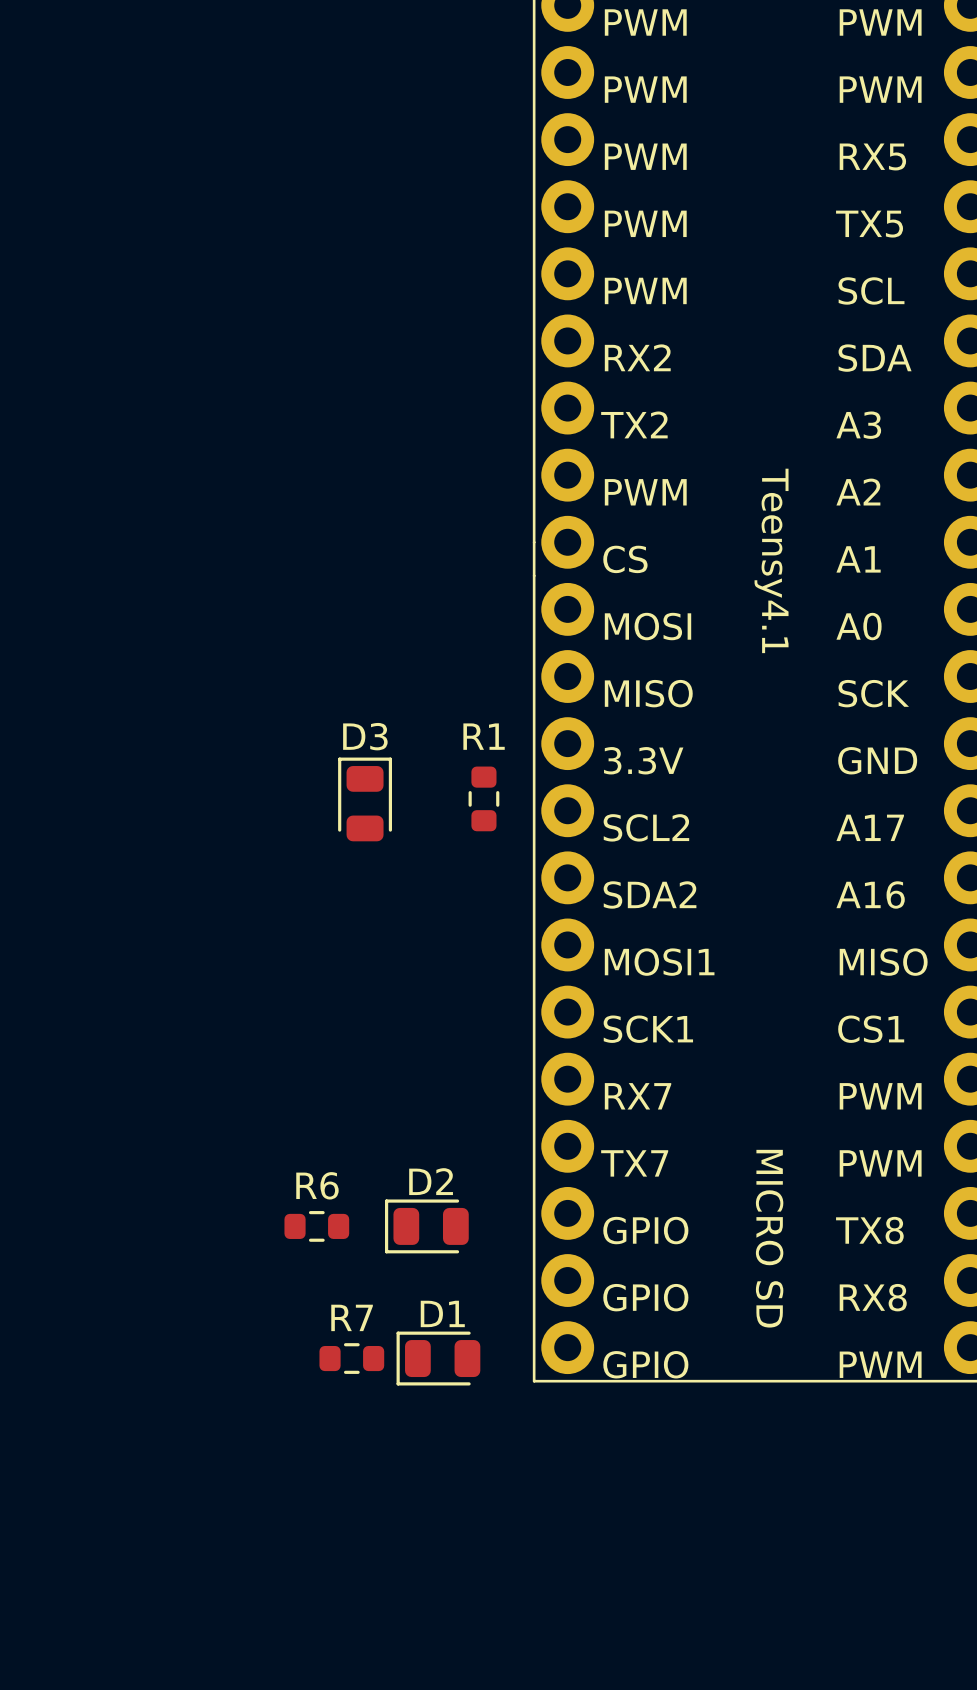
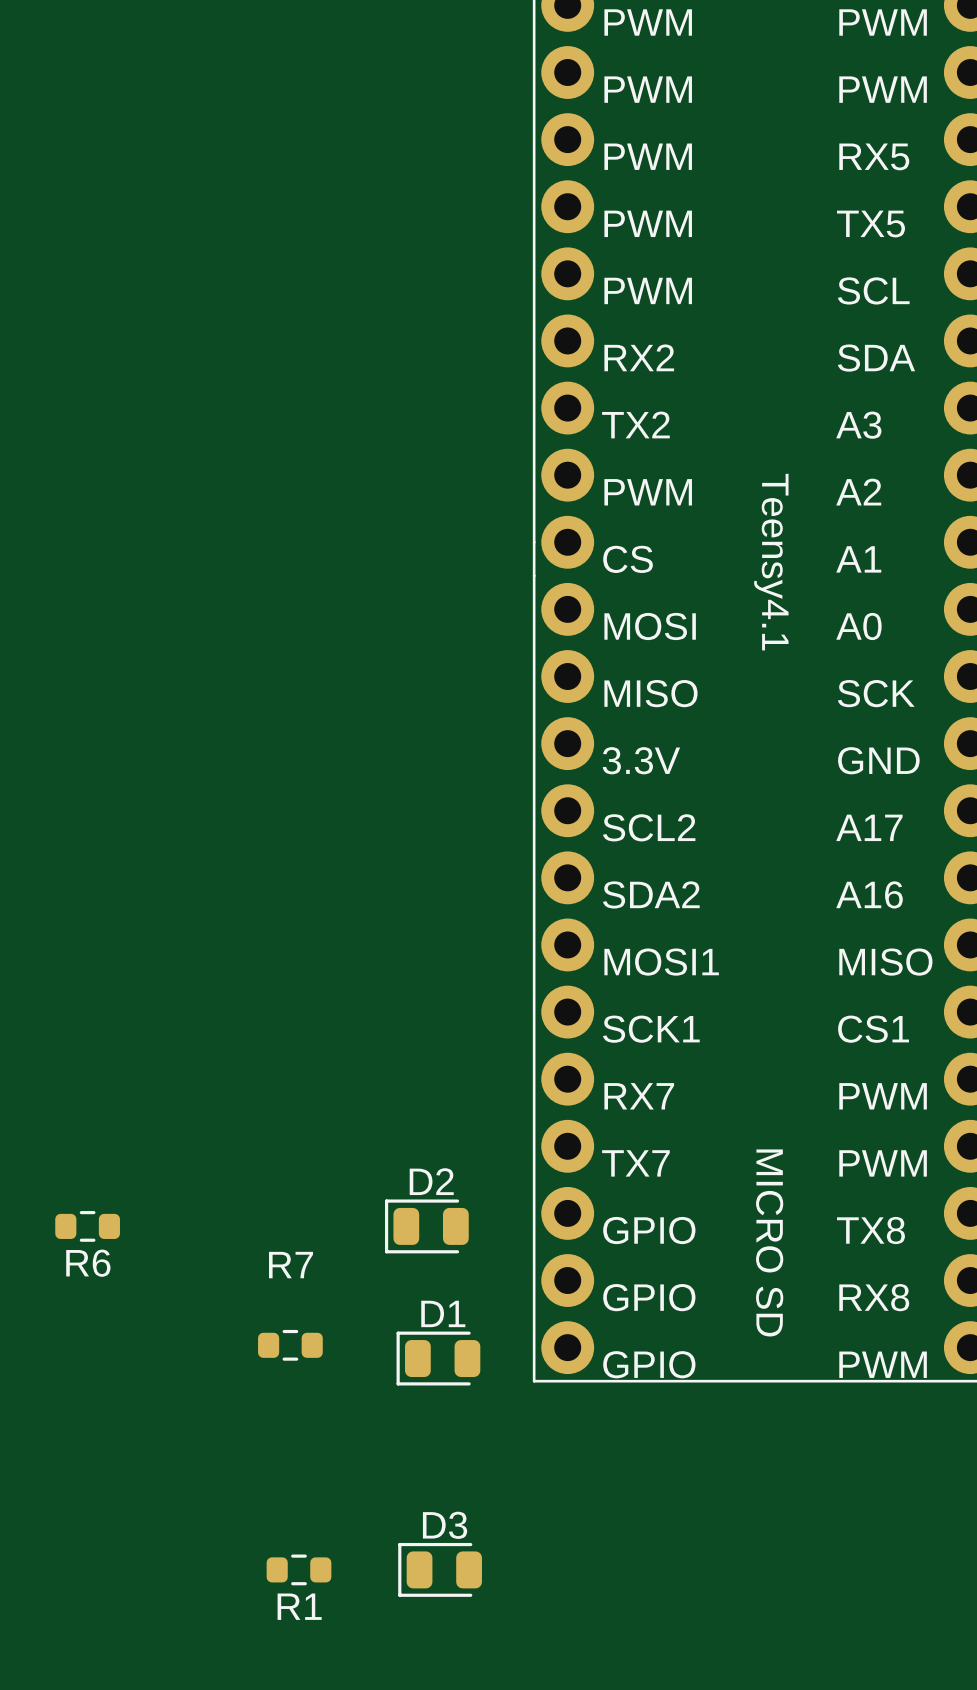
R1 name position: R1 (484, 736) -> R1 (299, 1606)
R1 rotation: 0° (483, 798) -> 90° clockwise (298, 1569)
R1 position: (483, 798) -> (298, 1569)
D3 rotation: 0° (365, 799) -> 90° counterclockwise (440, 1569)
D3 position: (365, 799) -> (440, 1569)
R6 name position: R6 (317, 1185) -> R6 (88, 1263)
R6 position: (316, 1226) -> (87, 1226)
R7 name position: R7 (352, 1317) -> R7 (291, 1265)
R7 position: (351, 1358) -> (290, 1345)

